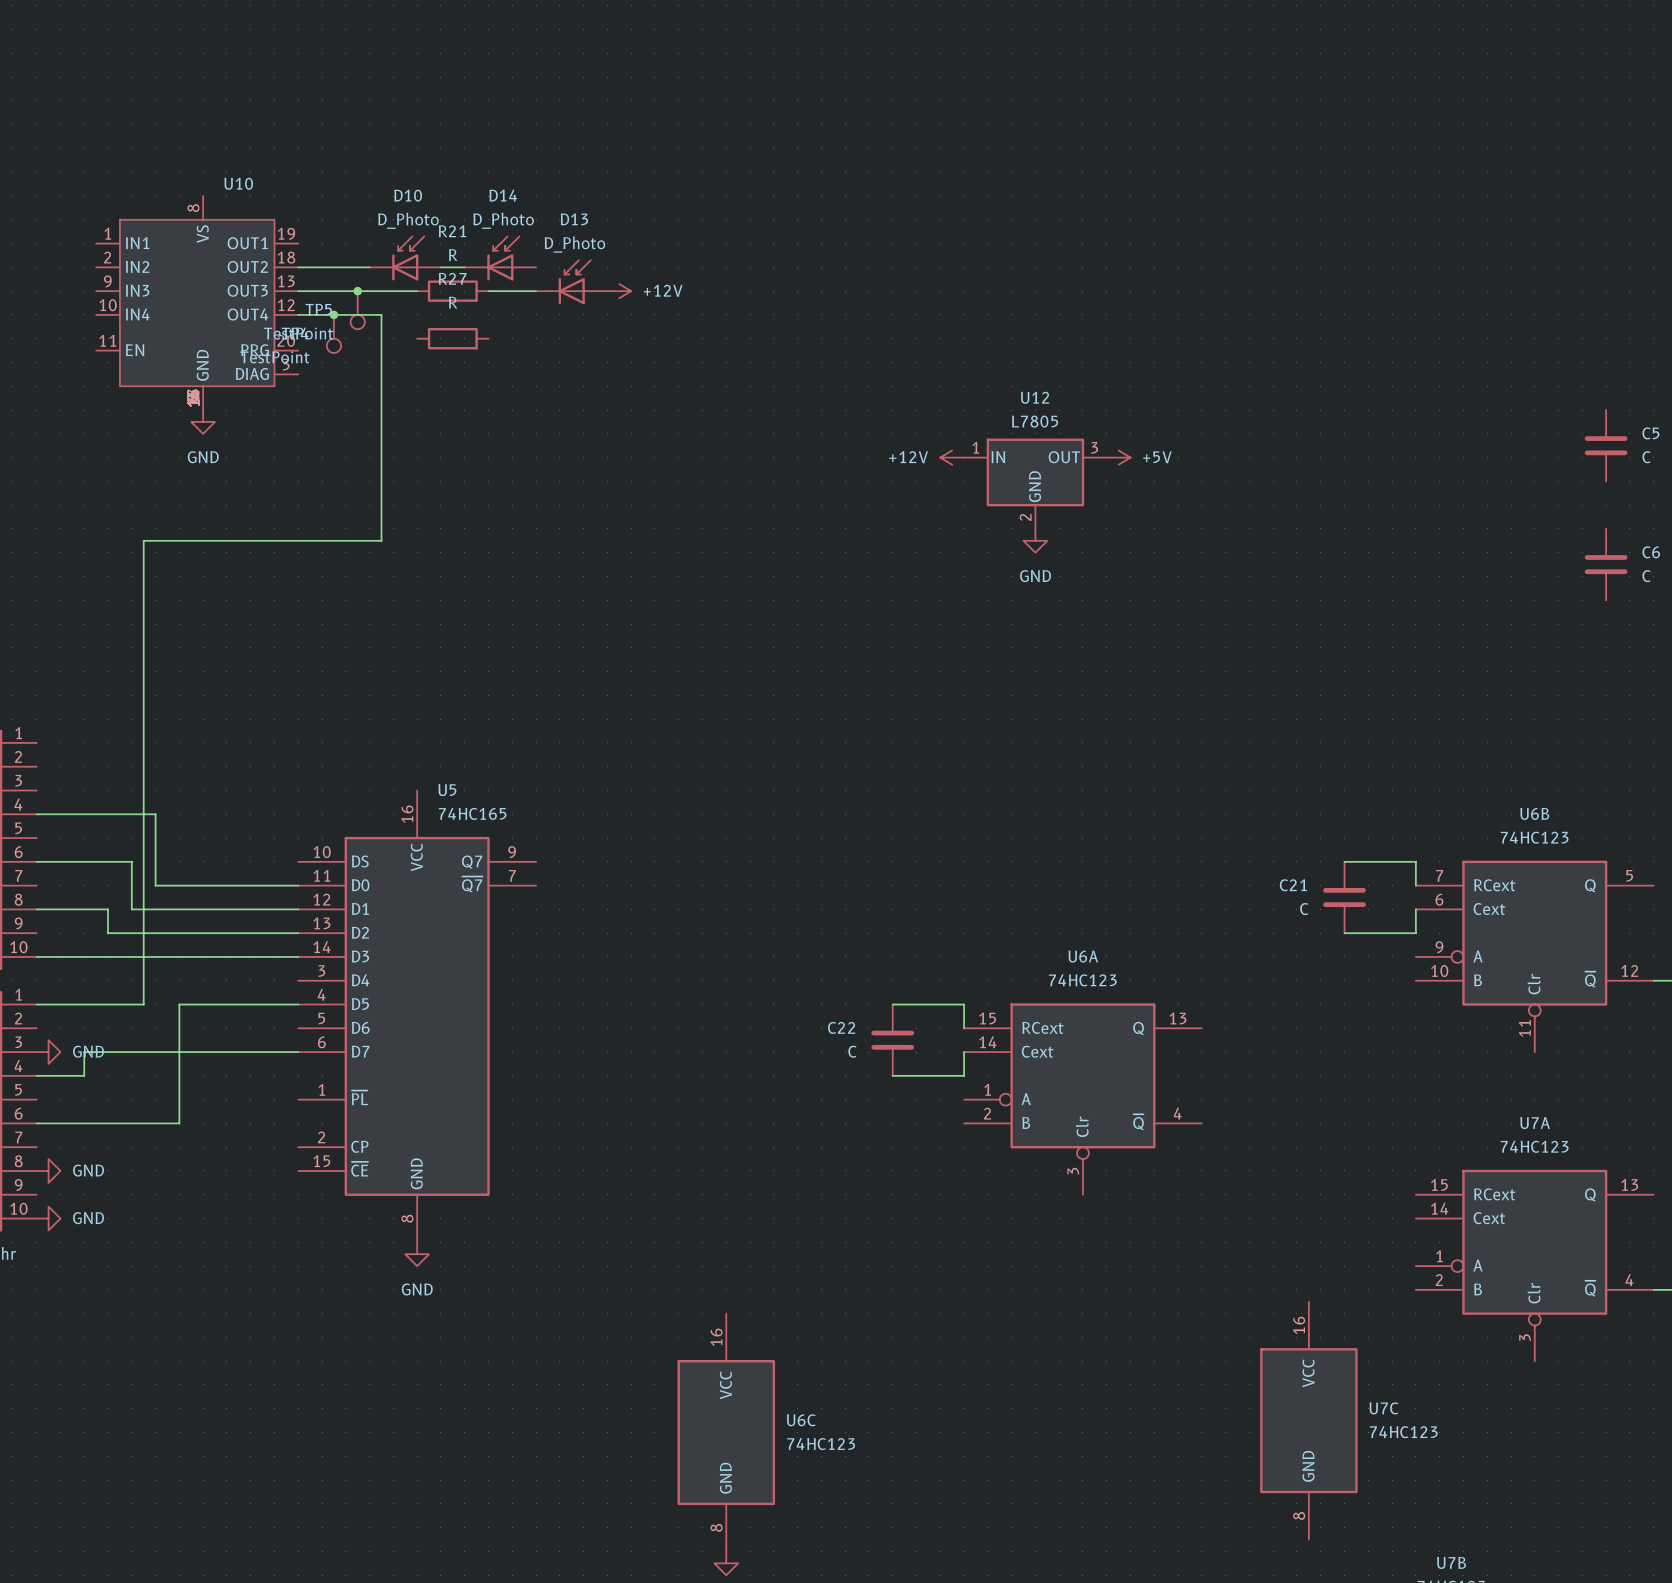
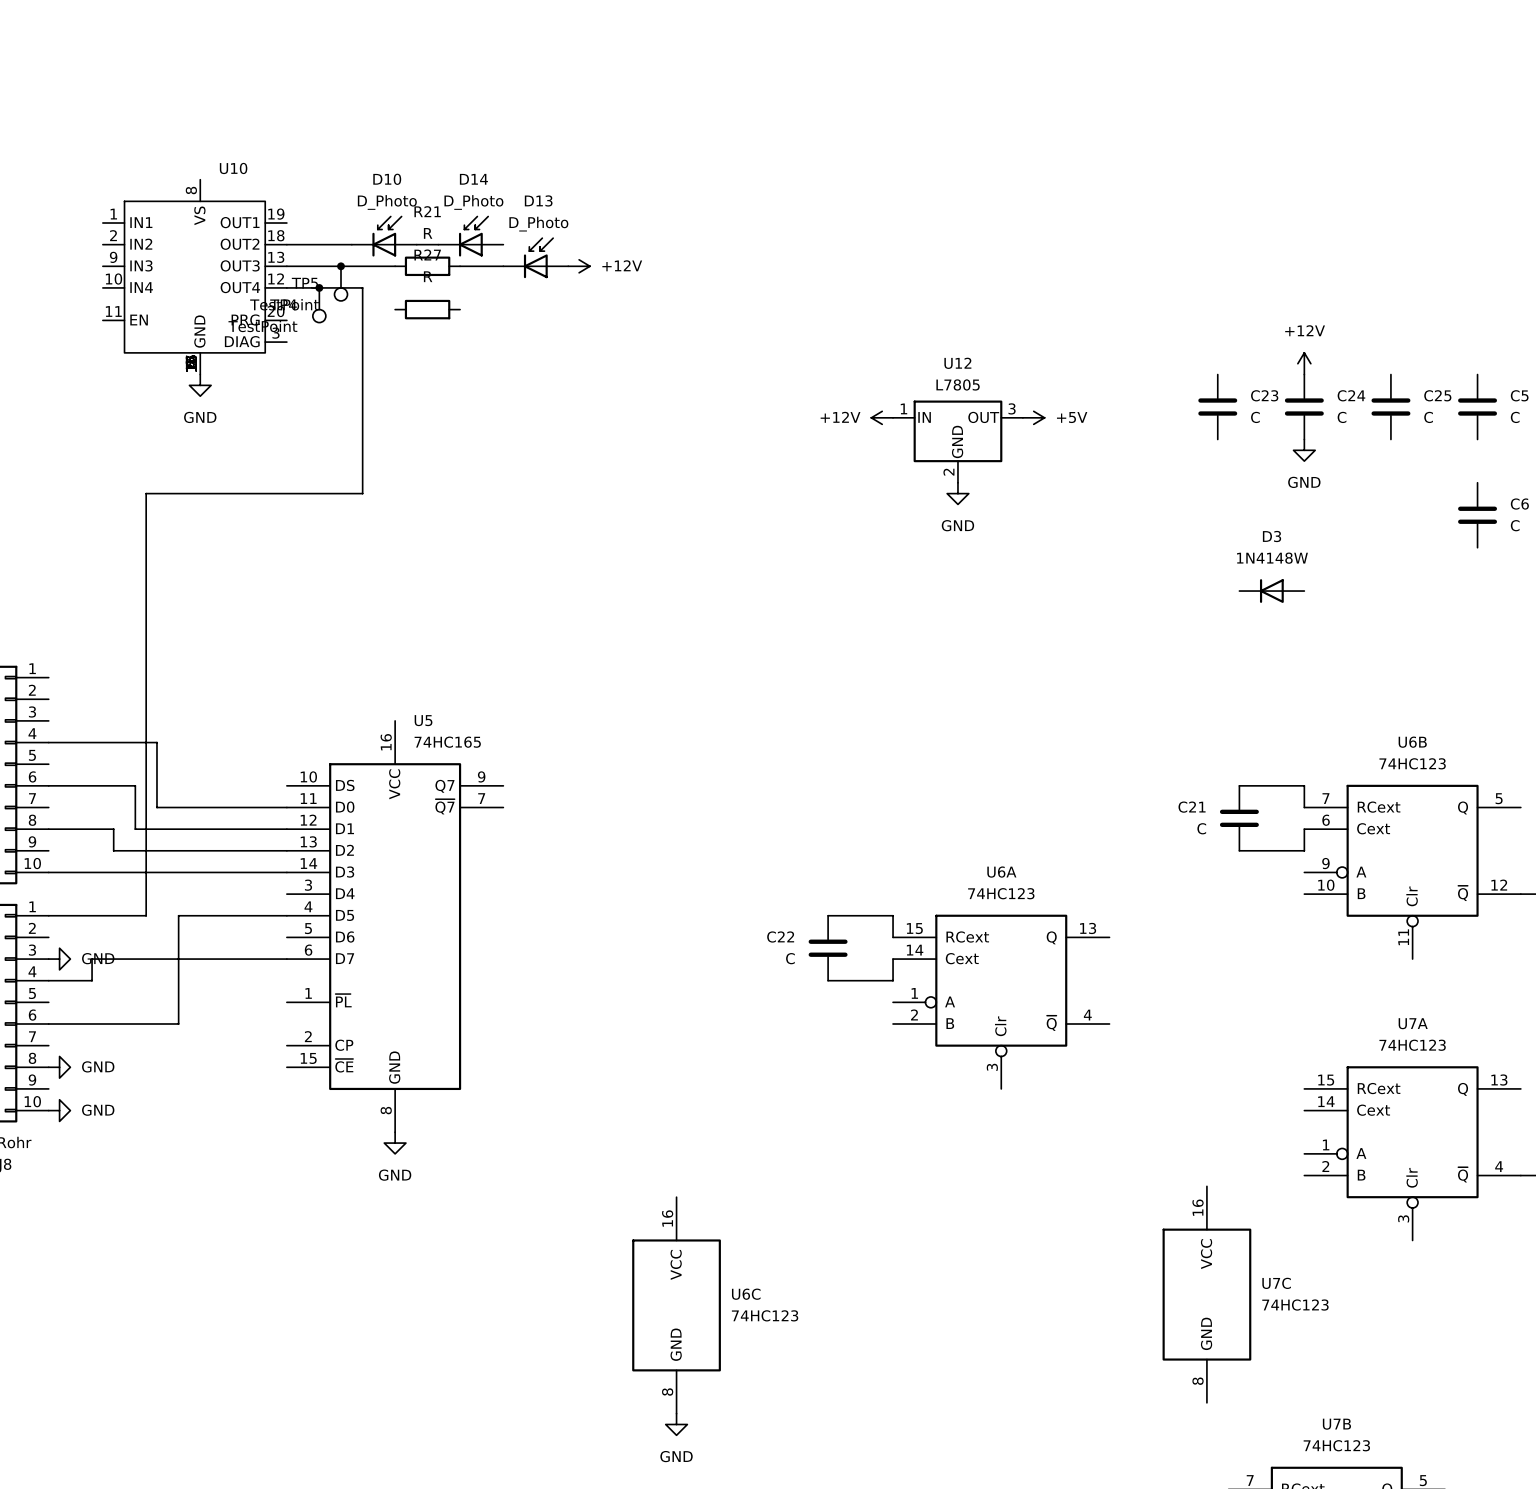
power symbol: none -> +12V (1304, 363)
C23: none -> C (1217, 407)
C24: none -> C (1304, 407)
C25: none -> C (1390, 407)
power symbol: none -> GND (1304, 450)
D3: none -> 1N4148W (1271, 591)

